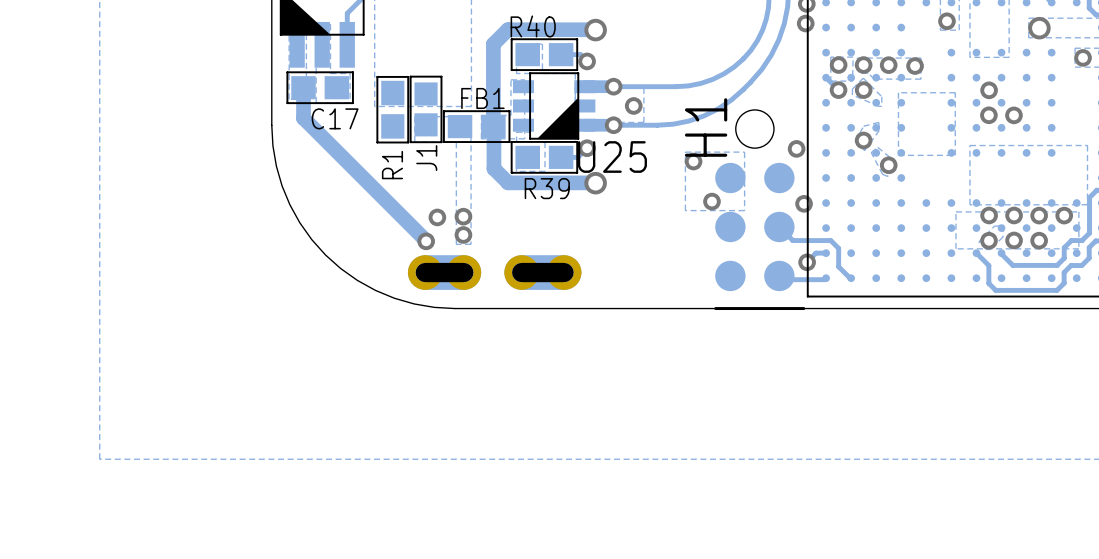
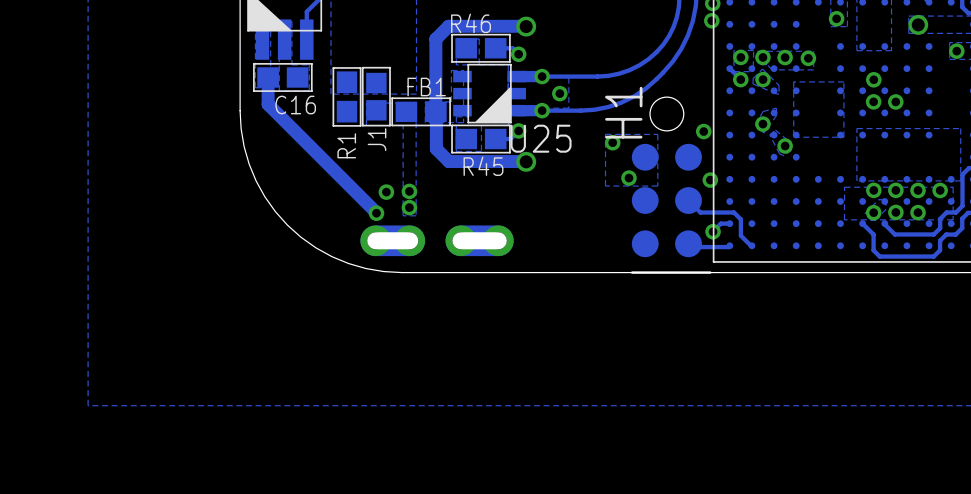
R40 name: R40 (533, 26) -> R46 (471, 23)
C17 name: C17 (335, 118) -> C16 (295, 105)
R39 name: R39 (547, 188) -> R45 (483, 166)

